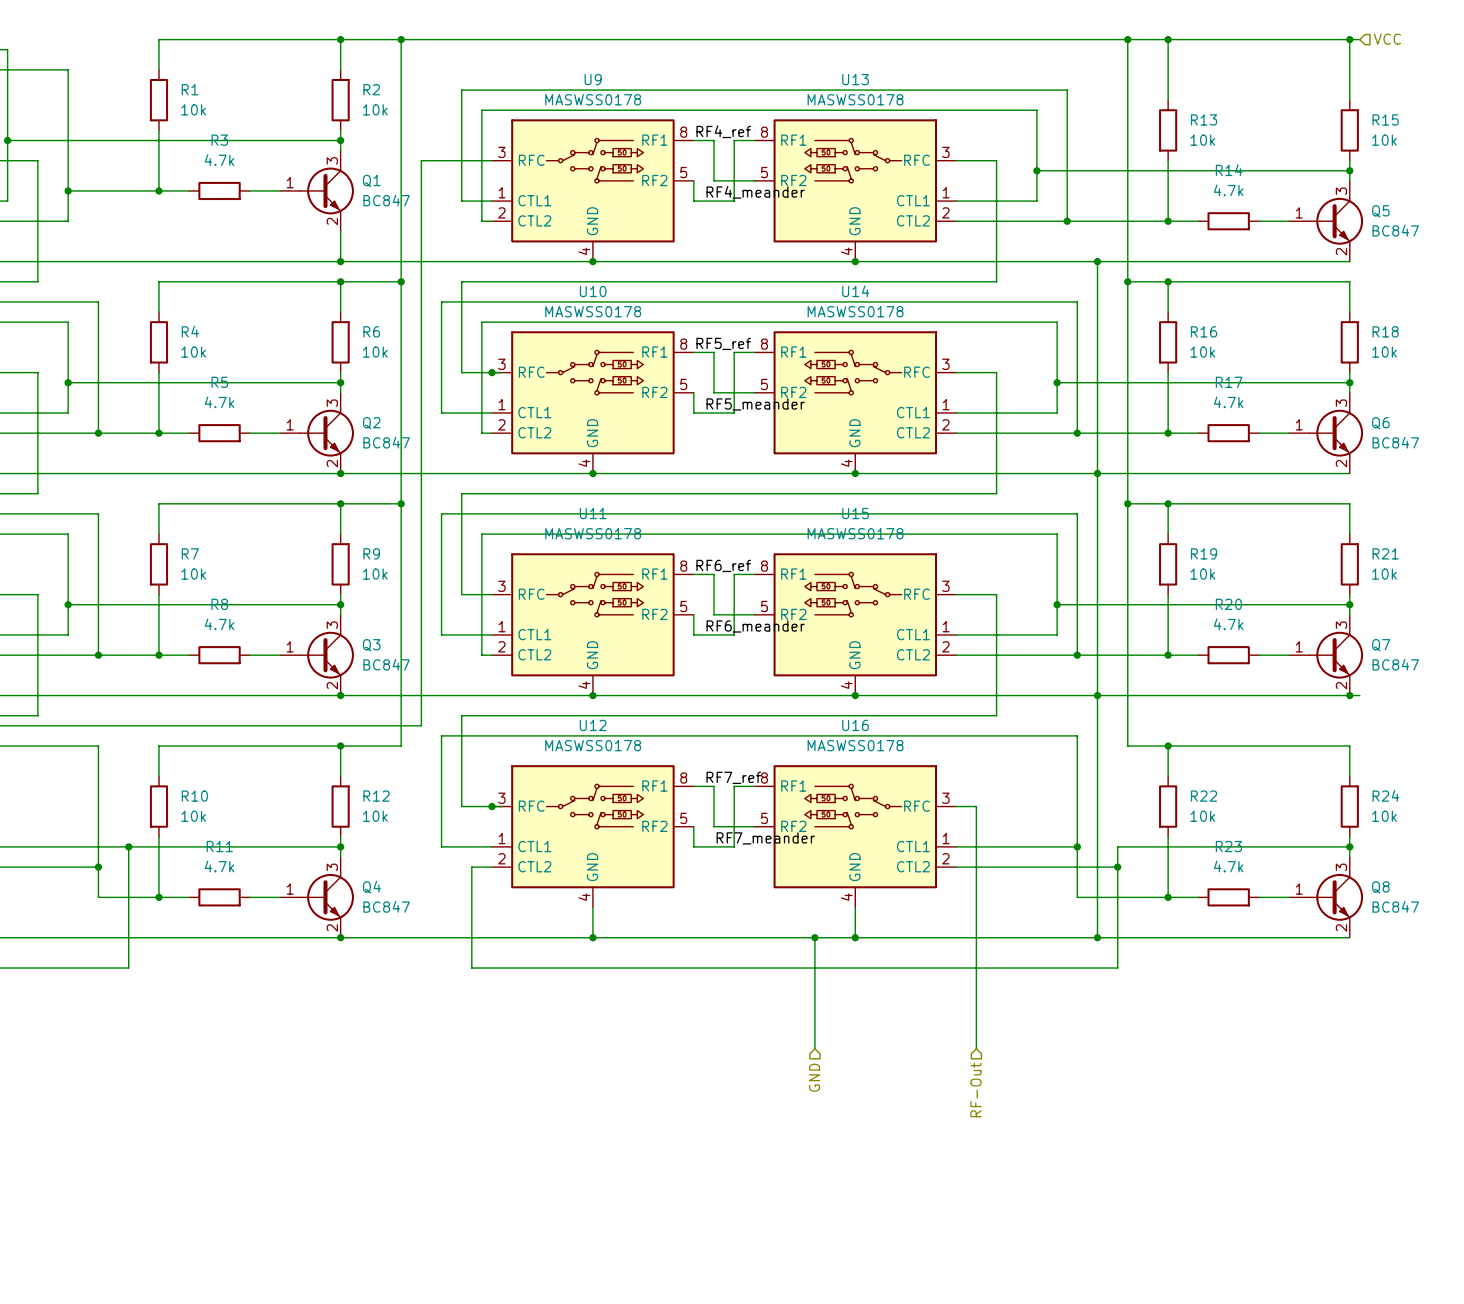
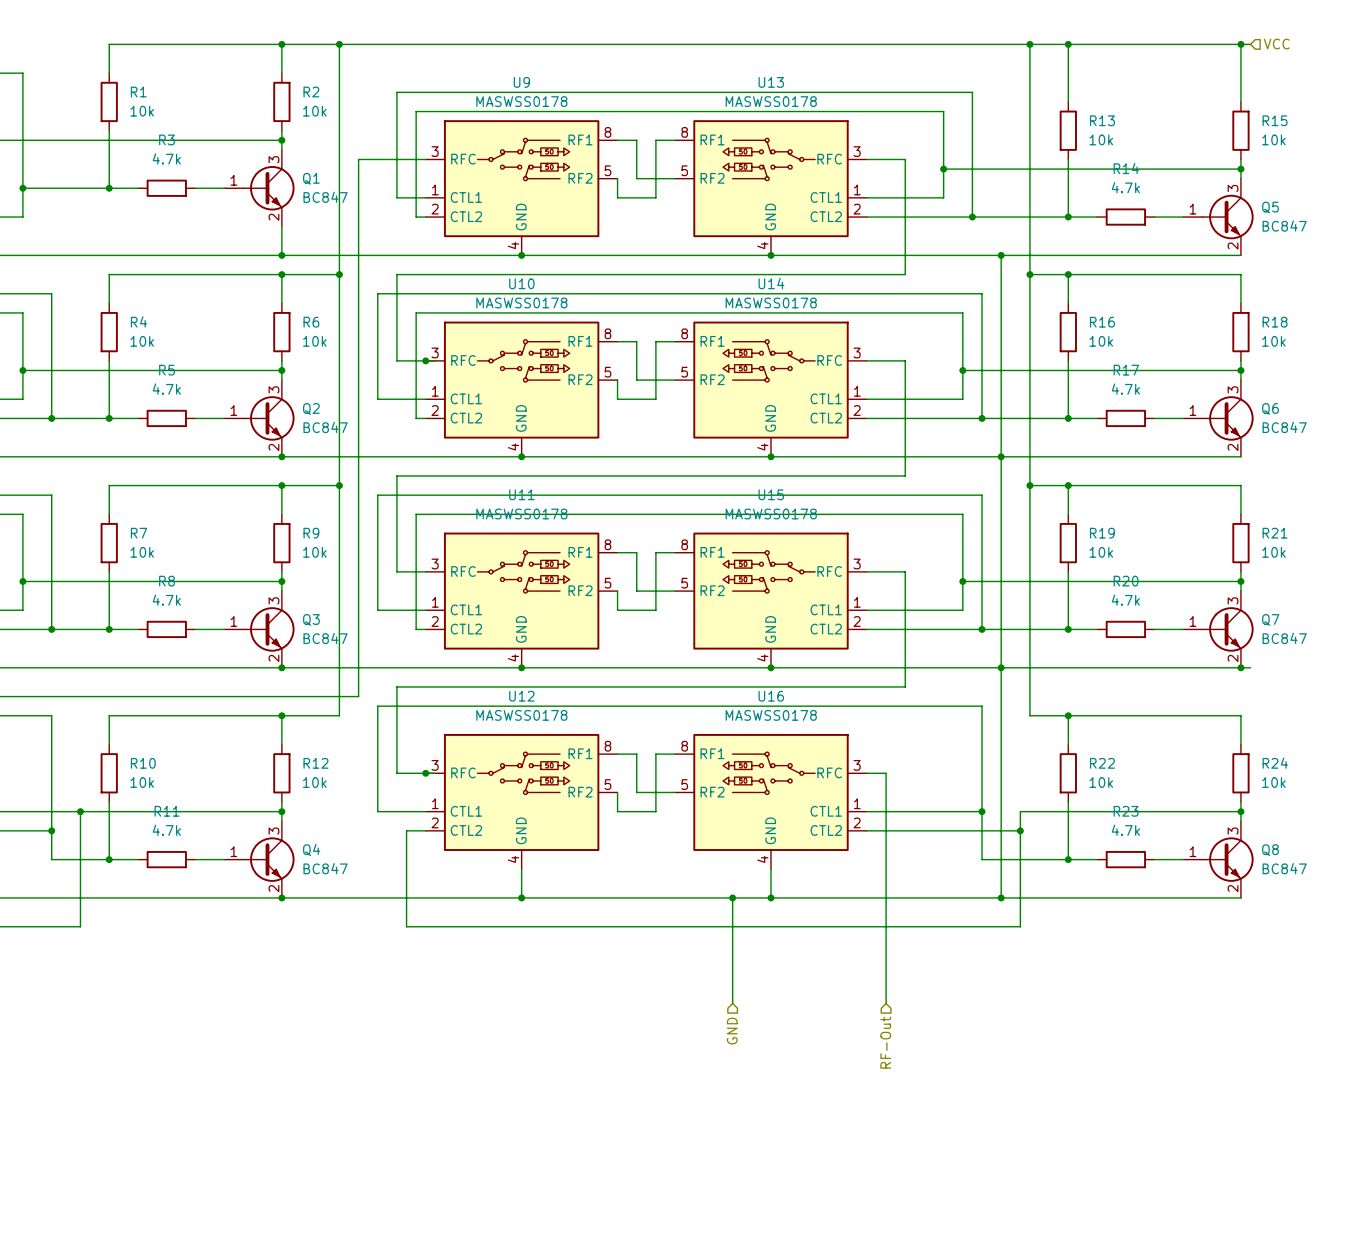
label: RF4_ref (723, 131) -> none
label: RF4_meander (755, 192) -> none
label: RF5_ref (723, 343) -> none
label: RF5_meander (755, 404) -> none
label: RF6_ref (723, 565) -> none
label: RF6_meander (755, 626) -> none
label: RF7_ref (733, 777) -> none
label: RF7_meander (765, 838) -> none

